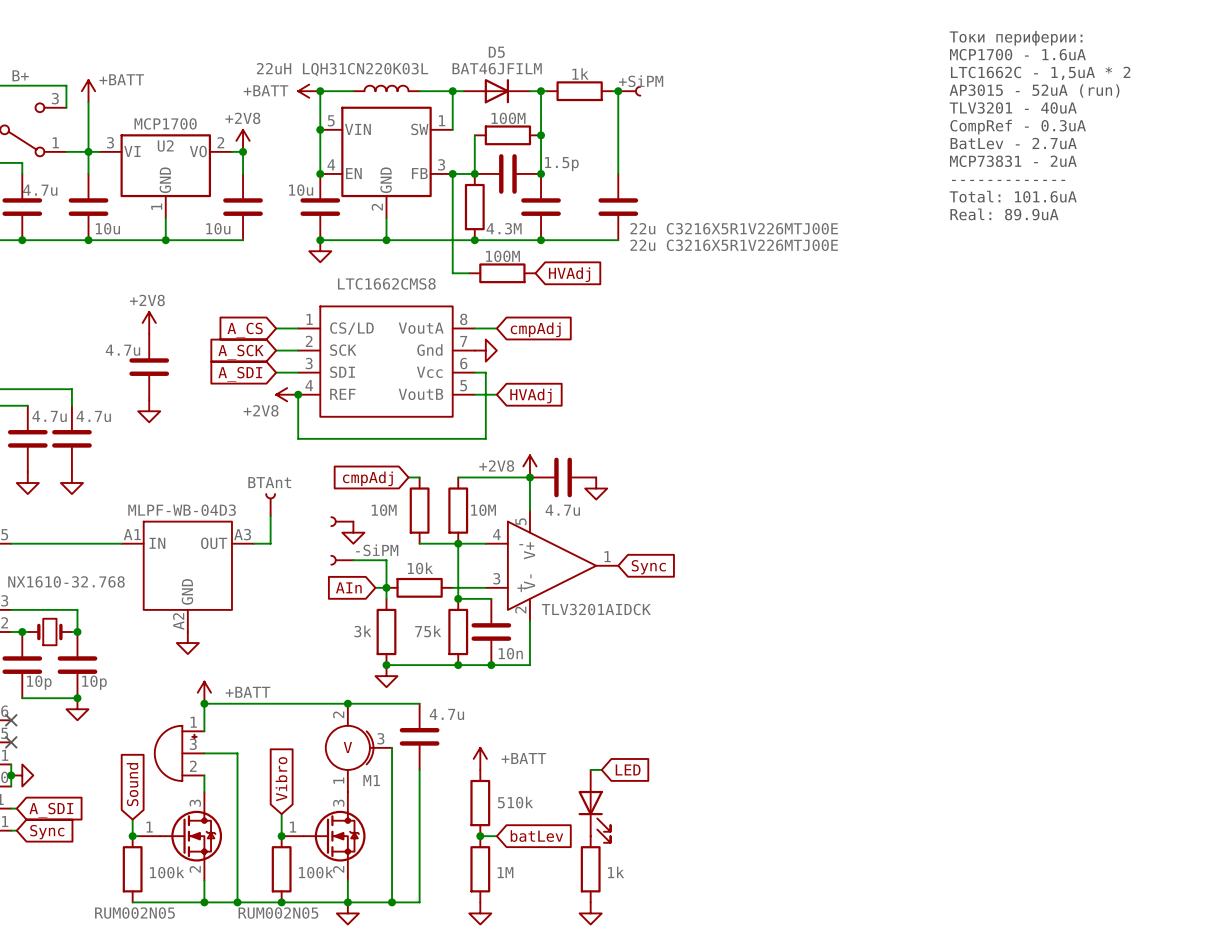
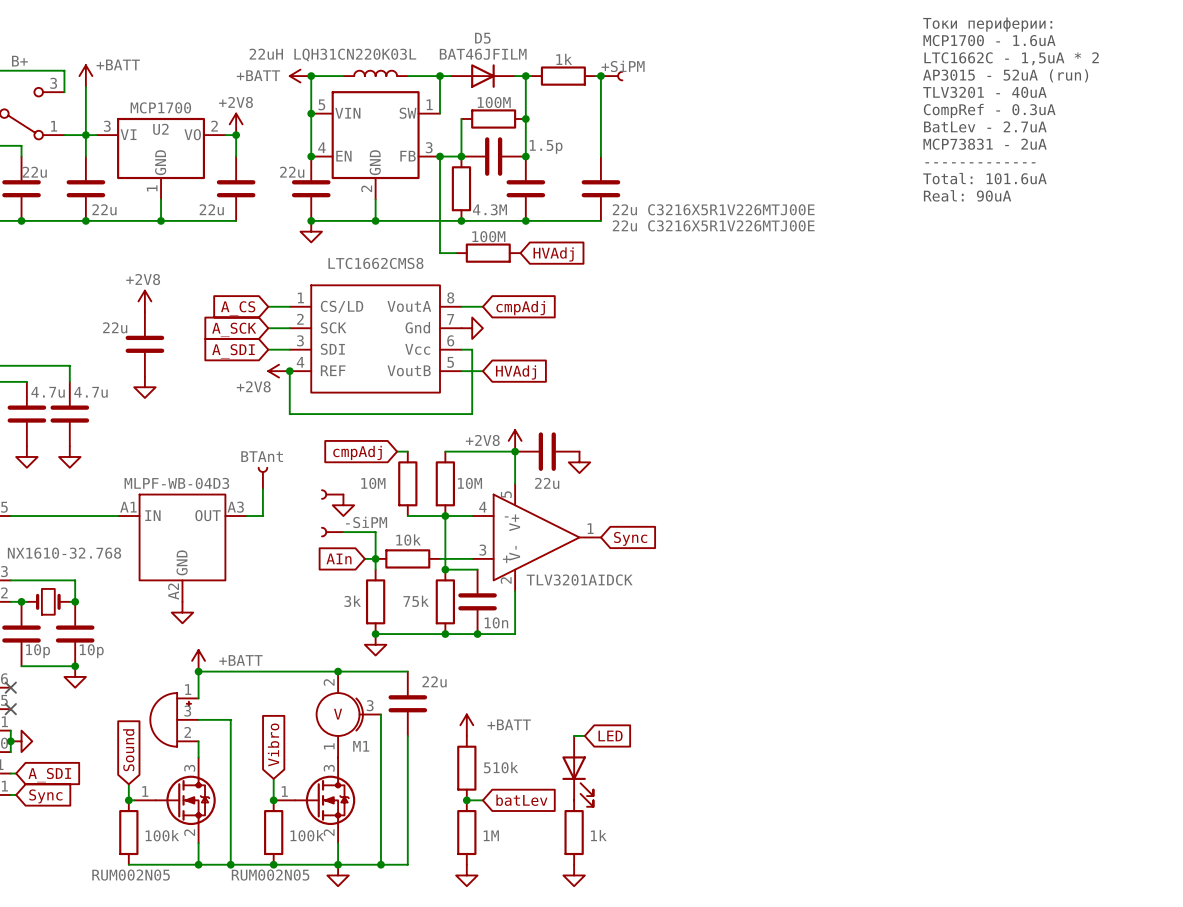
part value: 4.7u (40, 190) -> 22u (34, 172)
part value: 10u (301, 190) -> 22u (292, 172)
text: Real: 89.9uA (1004, 214) -> Real: 90uA (967, 195)
part value: 10u (107, 228) -> 22u (104, 209)
part value: 10u (218, 228) -> 22u (211, 209)
part value: 4.7u (123, 350) -> 22u (115, 327)
part value: 4.7u (562, 510) -> 22u (547, 483)
part value: 4.7u (446, 714) -> 22u (434, 681)

